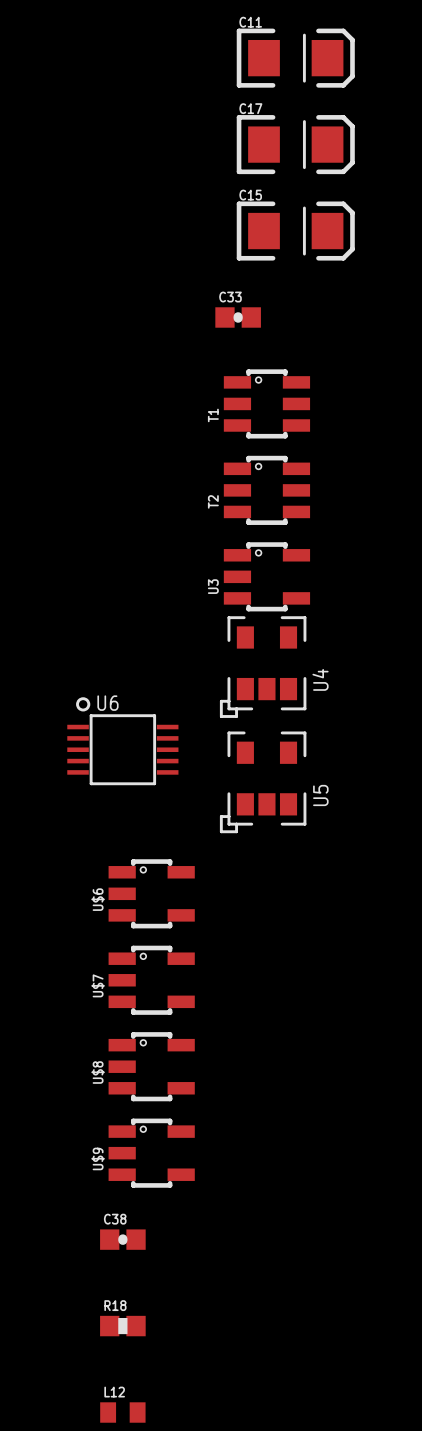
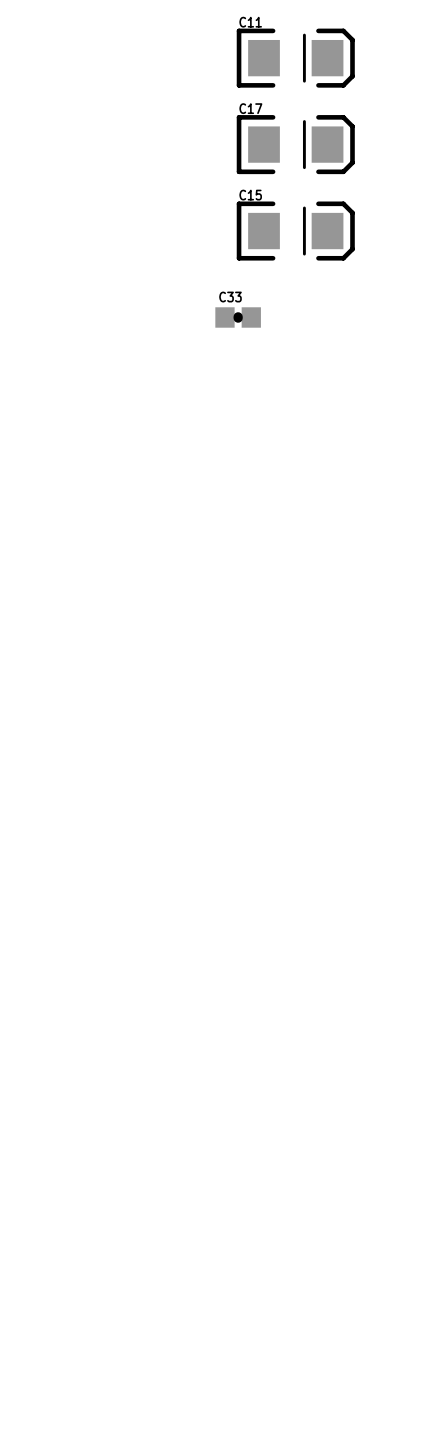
T1: (266, 403) -> none
T2: (266, 490) -> none
U3: (266, 576) -> none
U4: (263, 667) -> none
U6: (122, 741) -> none
U5: (263, 782) -> none
U$6: (151, 893) -> none
U$7: (151, 980) -> none
U$8: (151, 1066) -> none
U$9: (151, 1153) -> none
C38: (122, 1239) -> none
R18: (122, 1326) -> none
L12: (122, 1412) -> none

